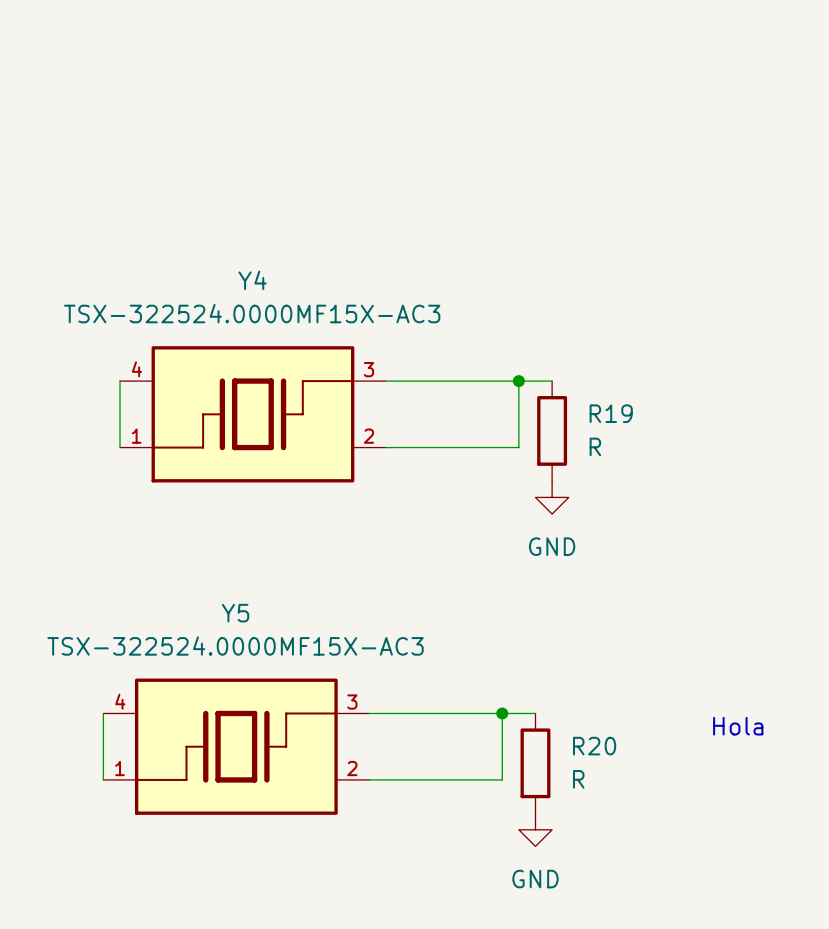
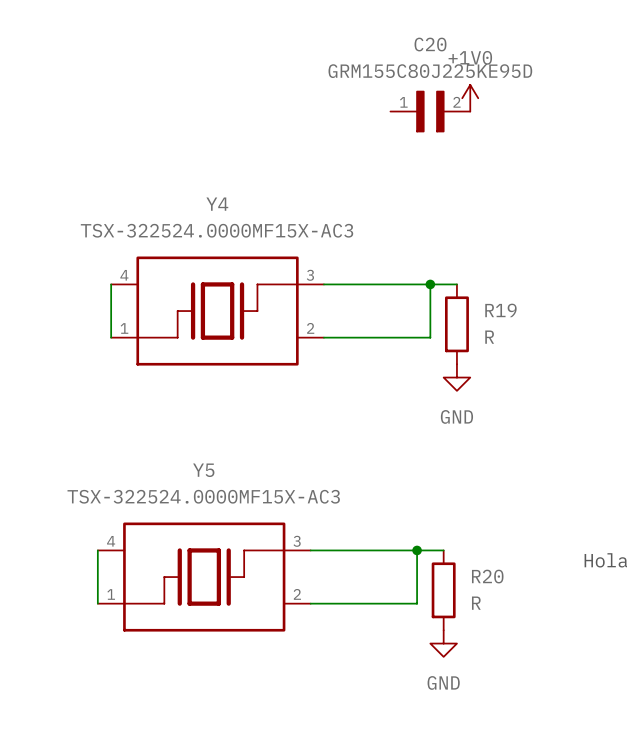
power symbol: none -> +1V0 (470, 98)
C20: none -> GRM155C80J225KE95D (430, 111)

